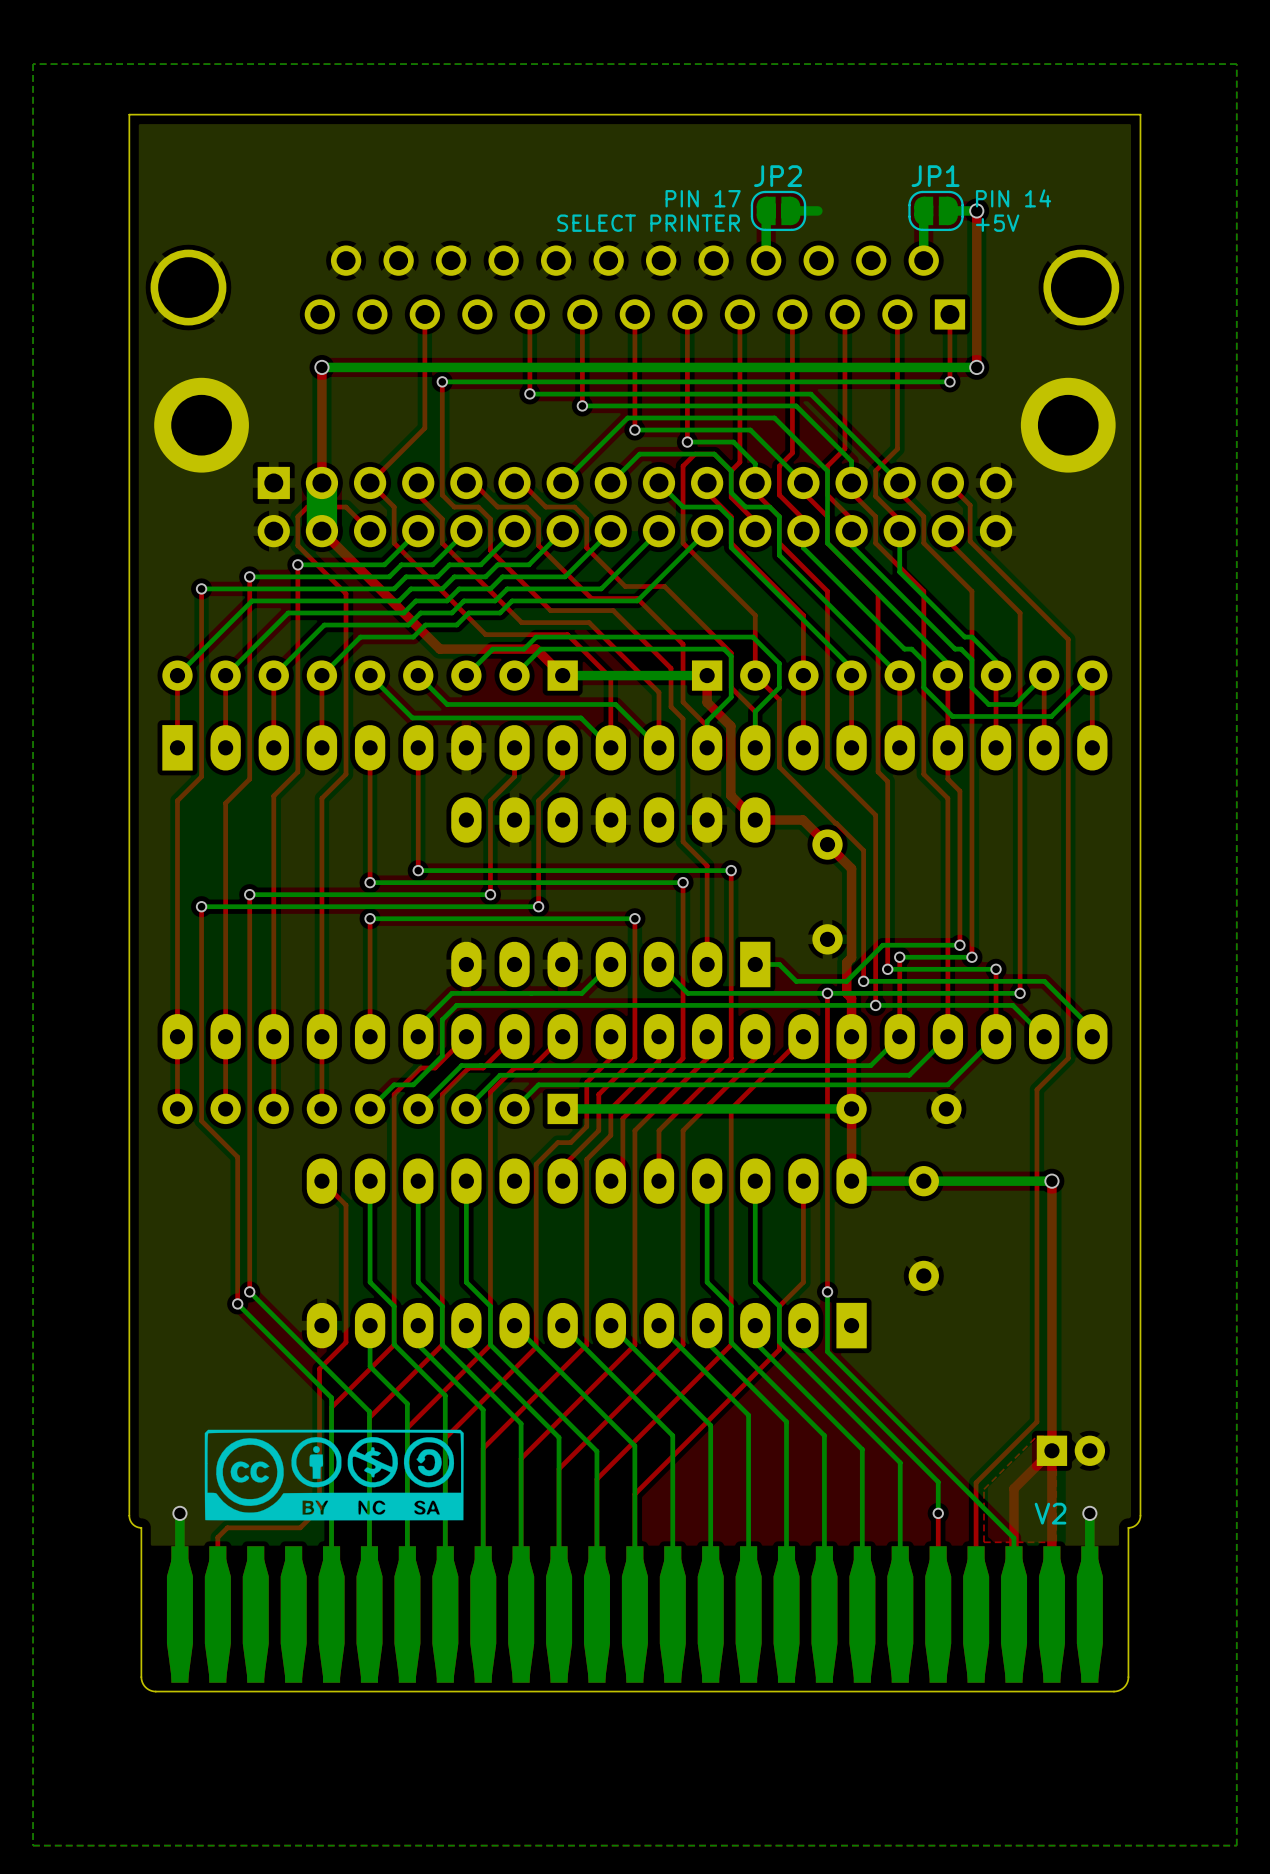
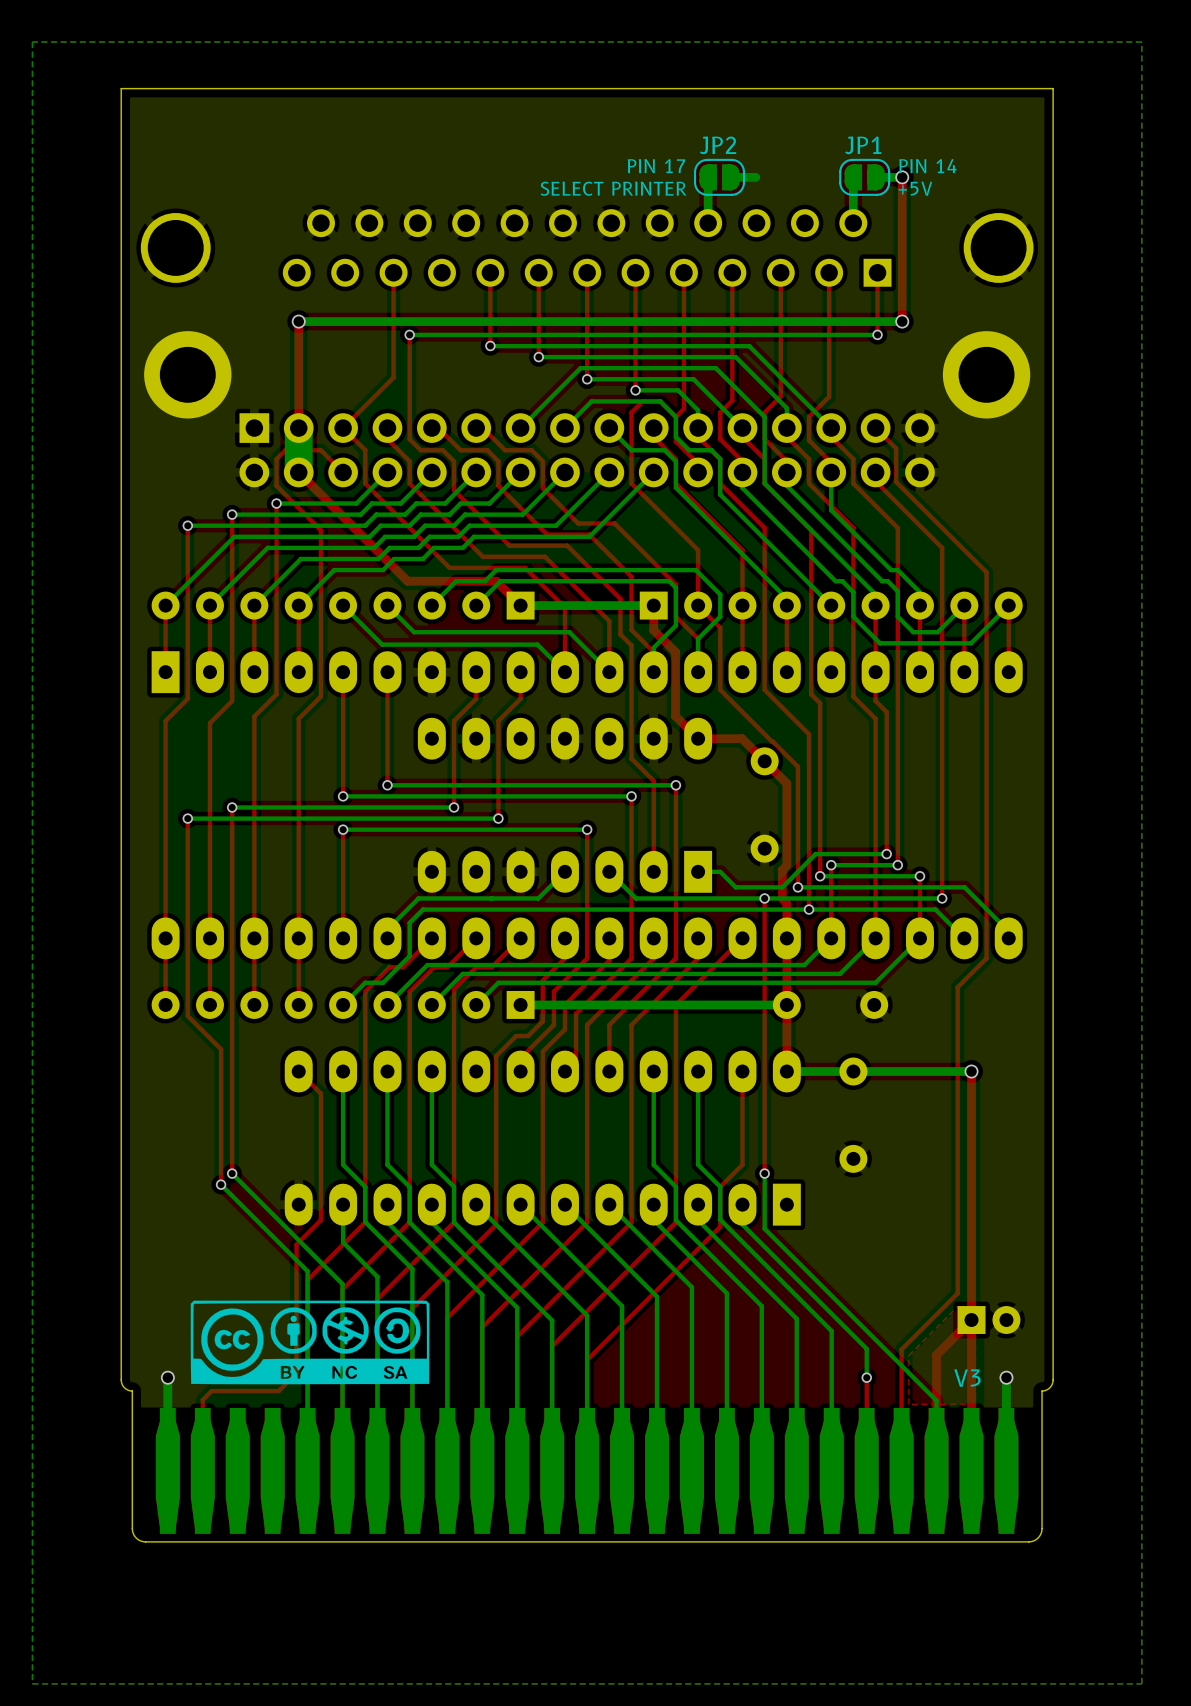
text: V2 (1050, 1513) -> V3 (967, 1378)

